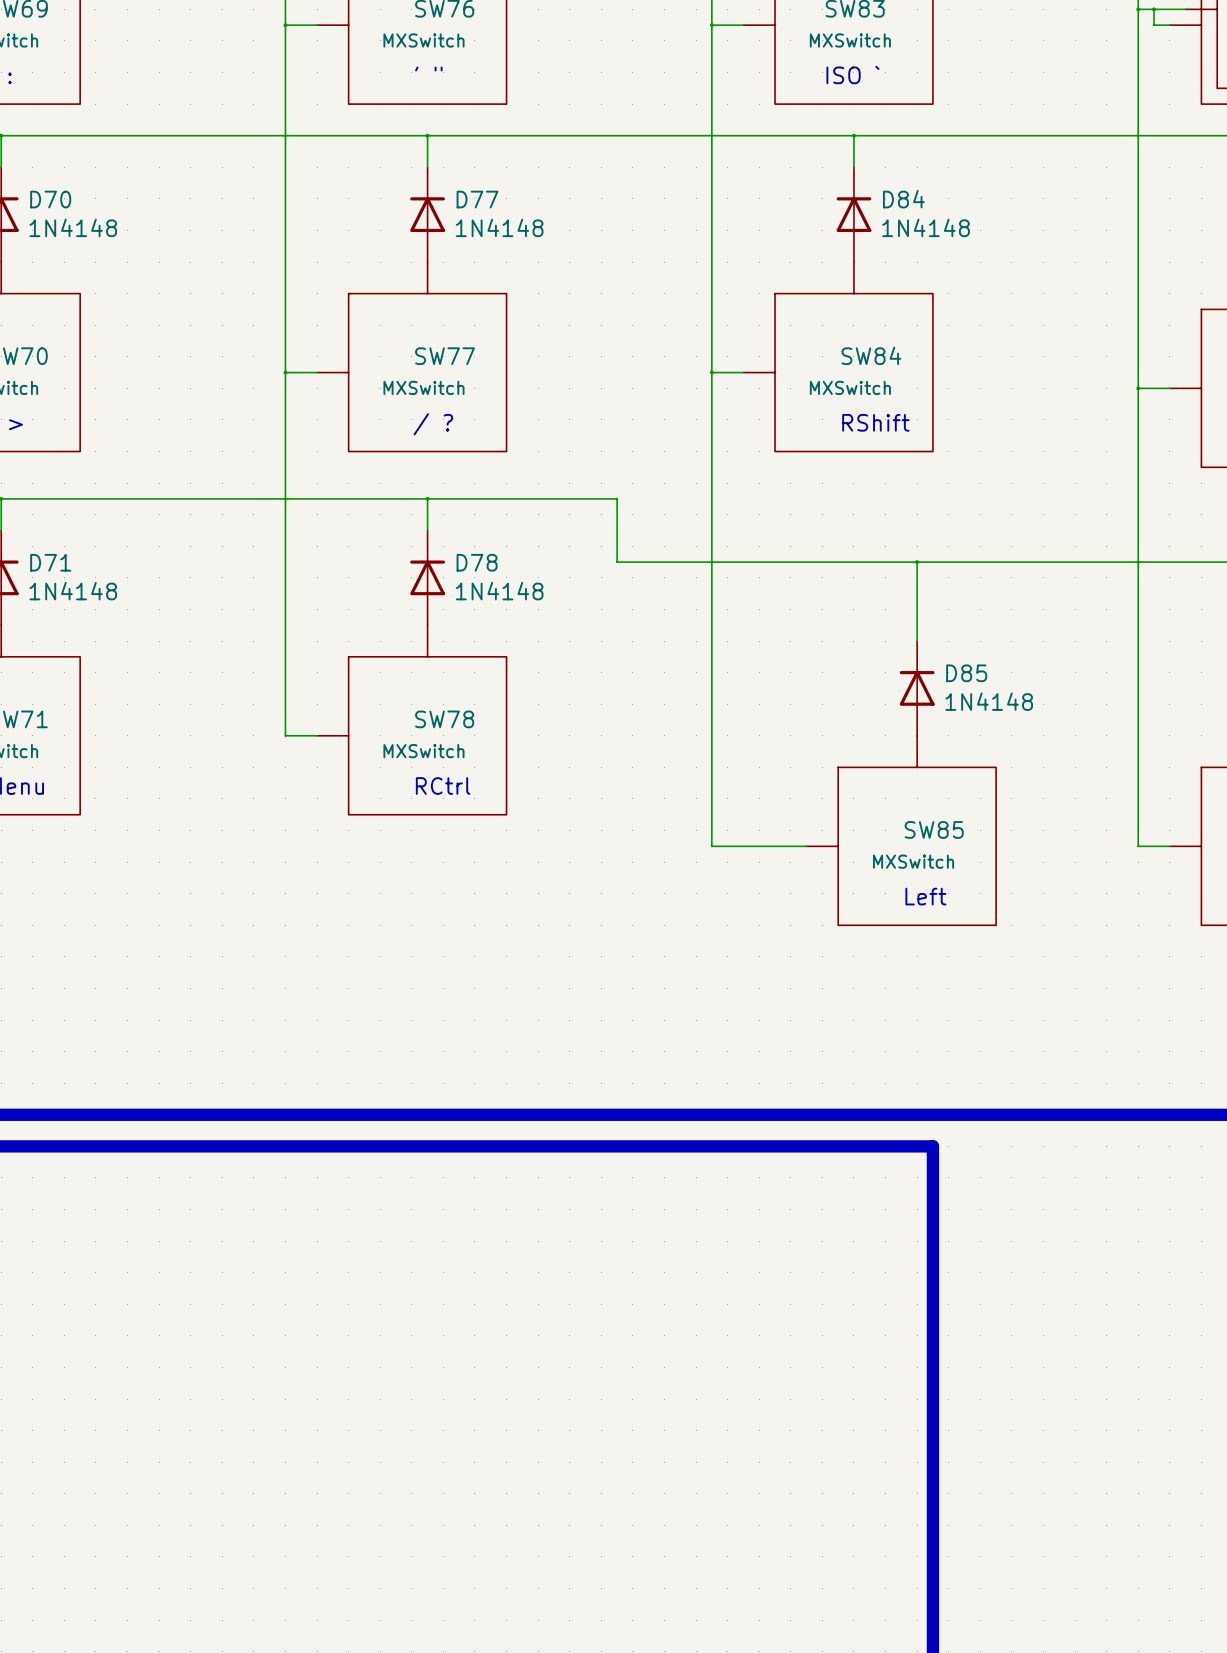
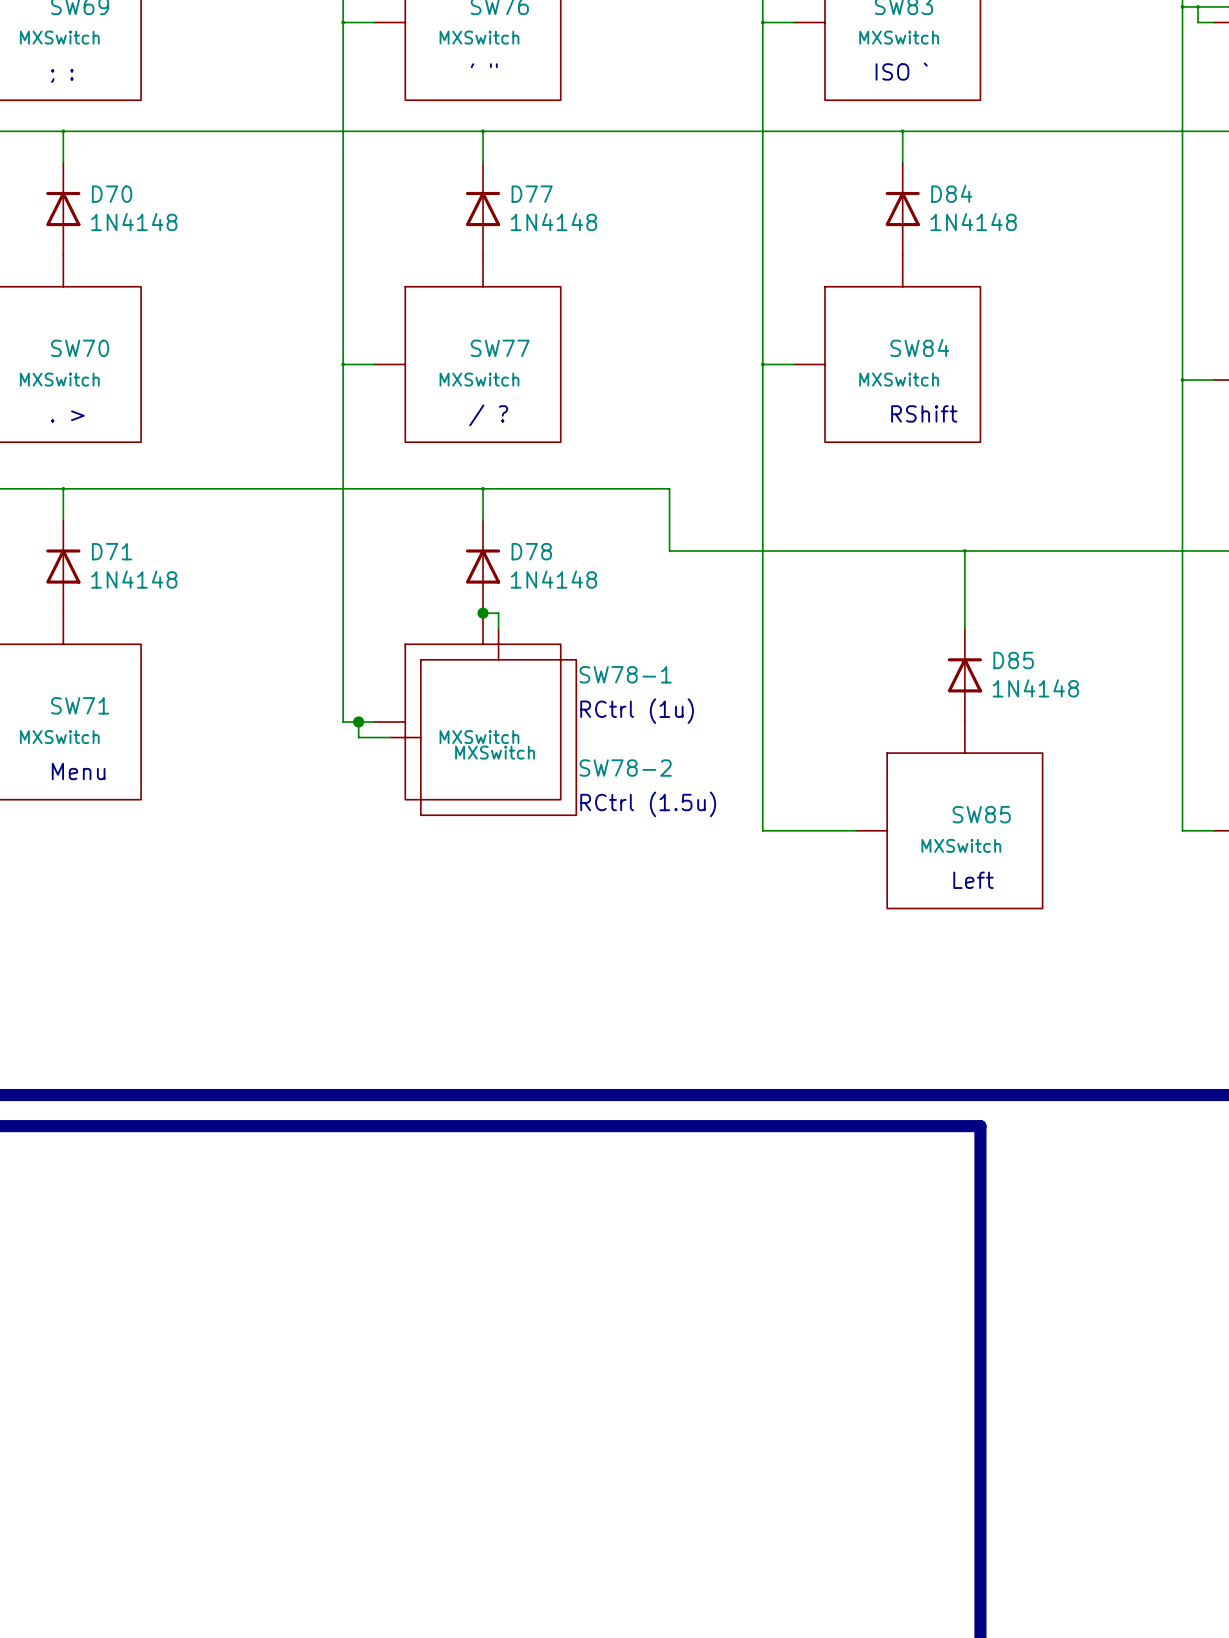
wire: none -> (483, 613) (498, 613) (498, 628)
junction: none -> (483, 613)
SW78 name: SW78 (444, 719) -> SW78-1 (625, 674)
text: none -> RCtrl (1u) (637, 711)
wire: none -> (358, 721) (358, 737) (389, 737)
junction: none -> (358, 721)
SW78-2: none -> MXSwitch (483, 721)
text: RCtrl (443, 786) -> none
text: none -> RCtrl (1.5u) (648, 804)

